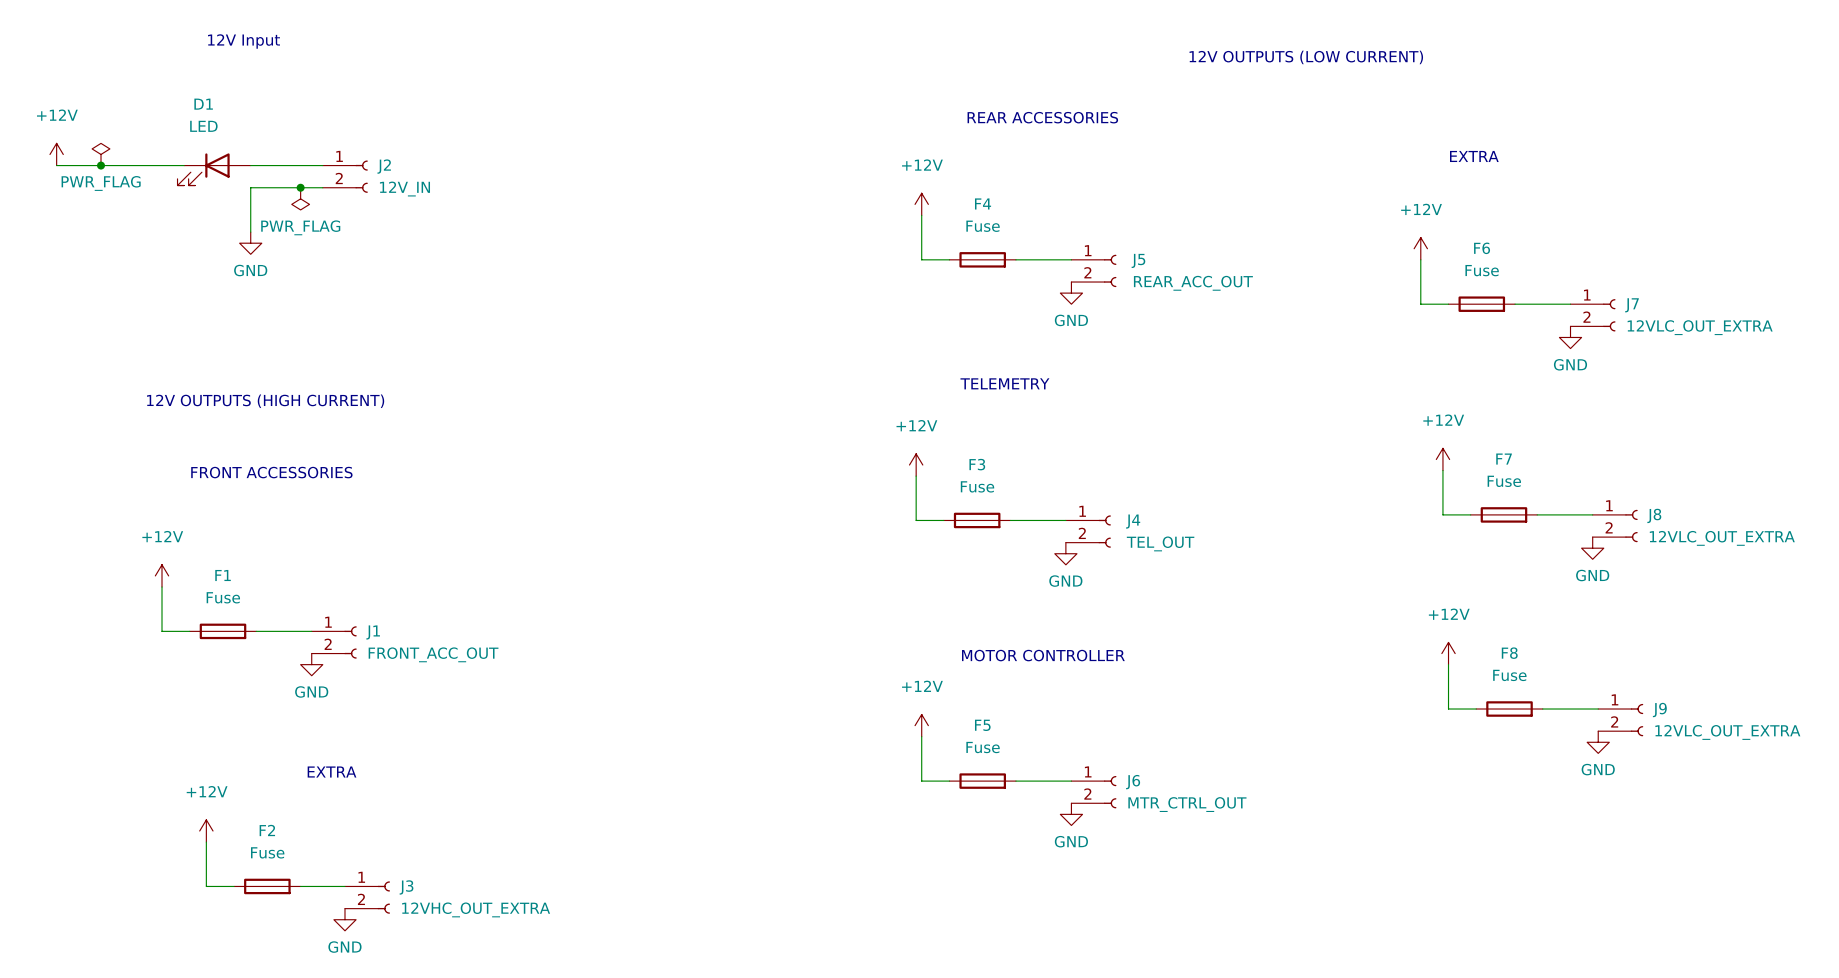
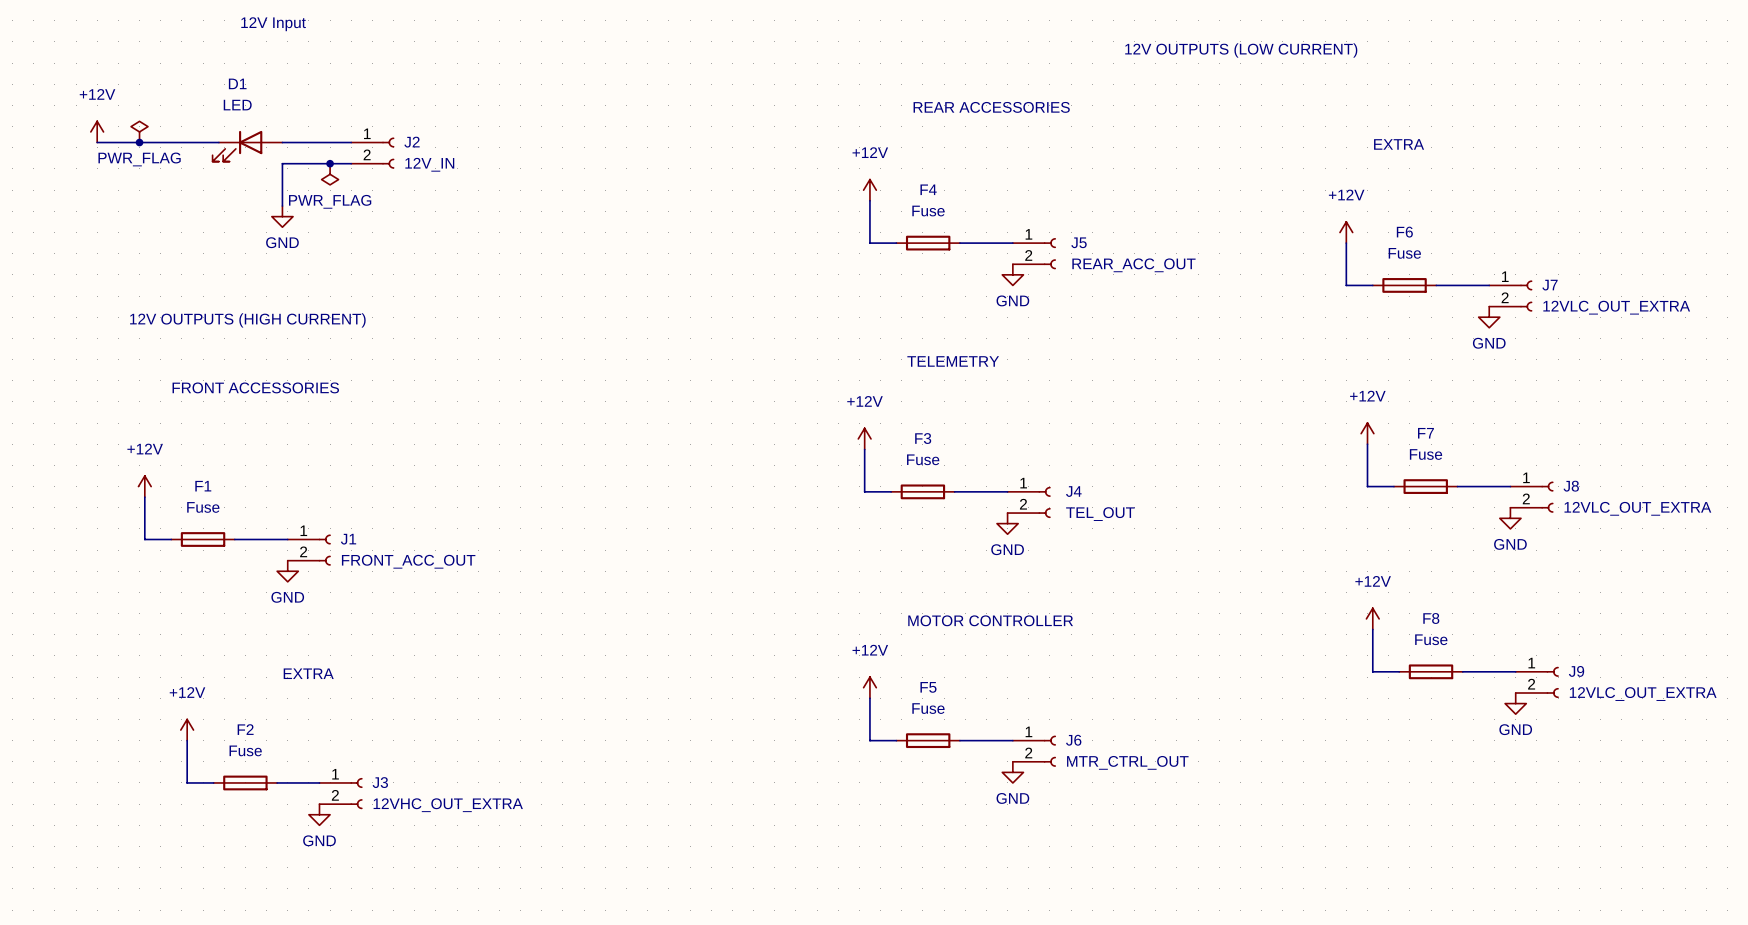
text position: 12V Input (244, 41) -> 12V Input (273, 24)
power symbol position: +12V (56, 154) -> +12V (97, 131)
power symbol position: PWR_FLAG (101, 154) -> PWR_FLAG (139, 131)
junction: none -> (139, 142)
wire: (56, 165) (184, 165) -> (97, 142) (218, 142)
junction: (101, 165) -> none
wire: (250, 165) (322, 165) -> (282, 142) (351, 142)
D1 position: (214, 169) -> (247, 146)
J2 position: (345, 176) -> (372, 153)
junction: none -> (330, 163)
junction: (300, 187) -> none
wire: (322, 187) (250, 187) (250, 232) -> (351, 163) (282, 163) (282, 206)
power symbol position: PWR_FLAG (300, 198) -> PWR_FLAG (330, 174)
power symbol position: GND (250, 243) -> GND (282, 216)
text position: 12V OUTPUTS (HIGH CURRENT) (265, 401) -> 12V OUTPUTS (HIGH CURRENT) (247, 320)
text position: FRONT ACCESSORIES (271, 472) -> FRONT ACCESSORIES (255, 387)
power symbol position: +12V (162, 575) -> +12V (144, 486)
wire: (162, 587) (162, 631) (189, 631) -> (144, 497) (144, 539) (171, 539)
F1 position: (222, 631) -> (203, 539)
wire: (256, 631) (311, 631) -> (234, 539) (287, 539)
J1 position: (334, 642) -> (309, 550)
power symbol position: GND (311, 664) -> GND (287, 571)
text position: EXTRA (332, 772) -> EXTRA (308, 673)
power symbol position: +12V (206, 831) -> +12V (187, 730)
wire: (206, 842) (206, 886) (234, 886) -> (187, 740) (187, 782) (213, 782)
F2 position: (267, 886) -> (245, 782)
wire: (300, 886) (344, 886) -> (277, 782) (319, 782)
J3 position: (367, 897) -> (340, 793)
power symbol position: GND (344, 919) -> GND (319, 814)

